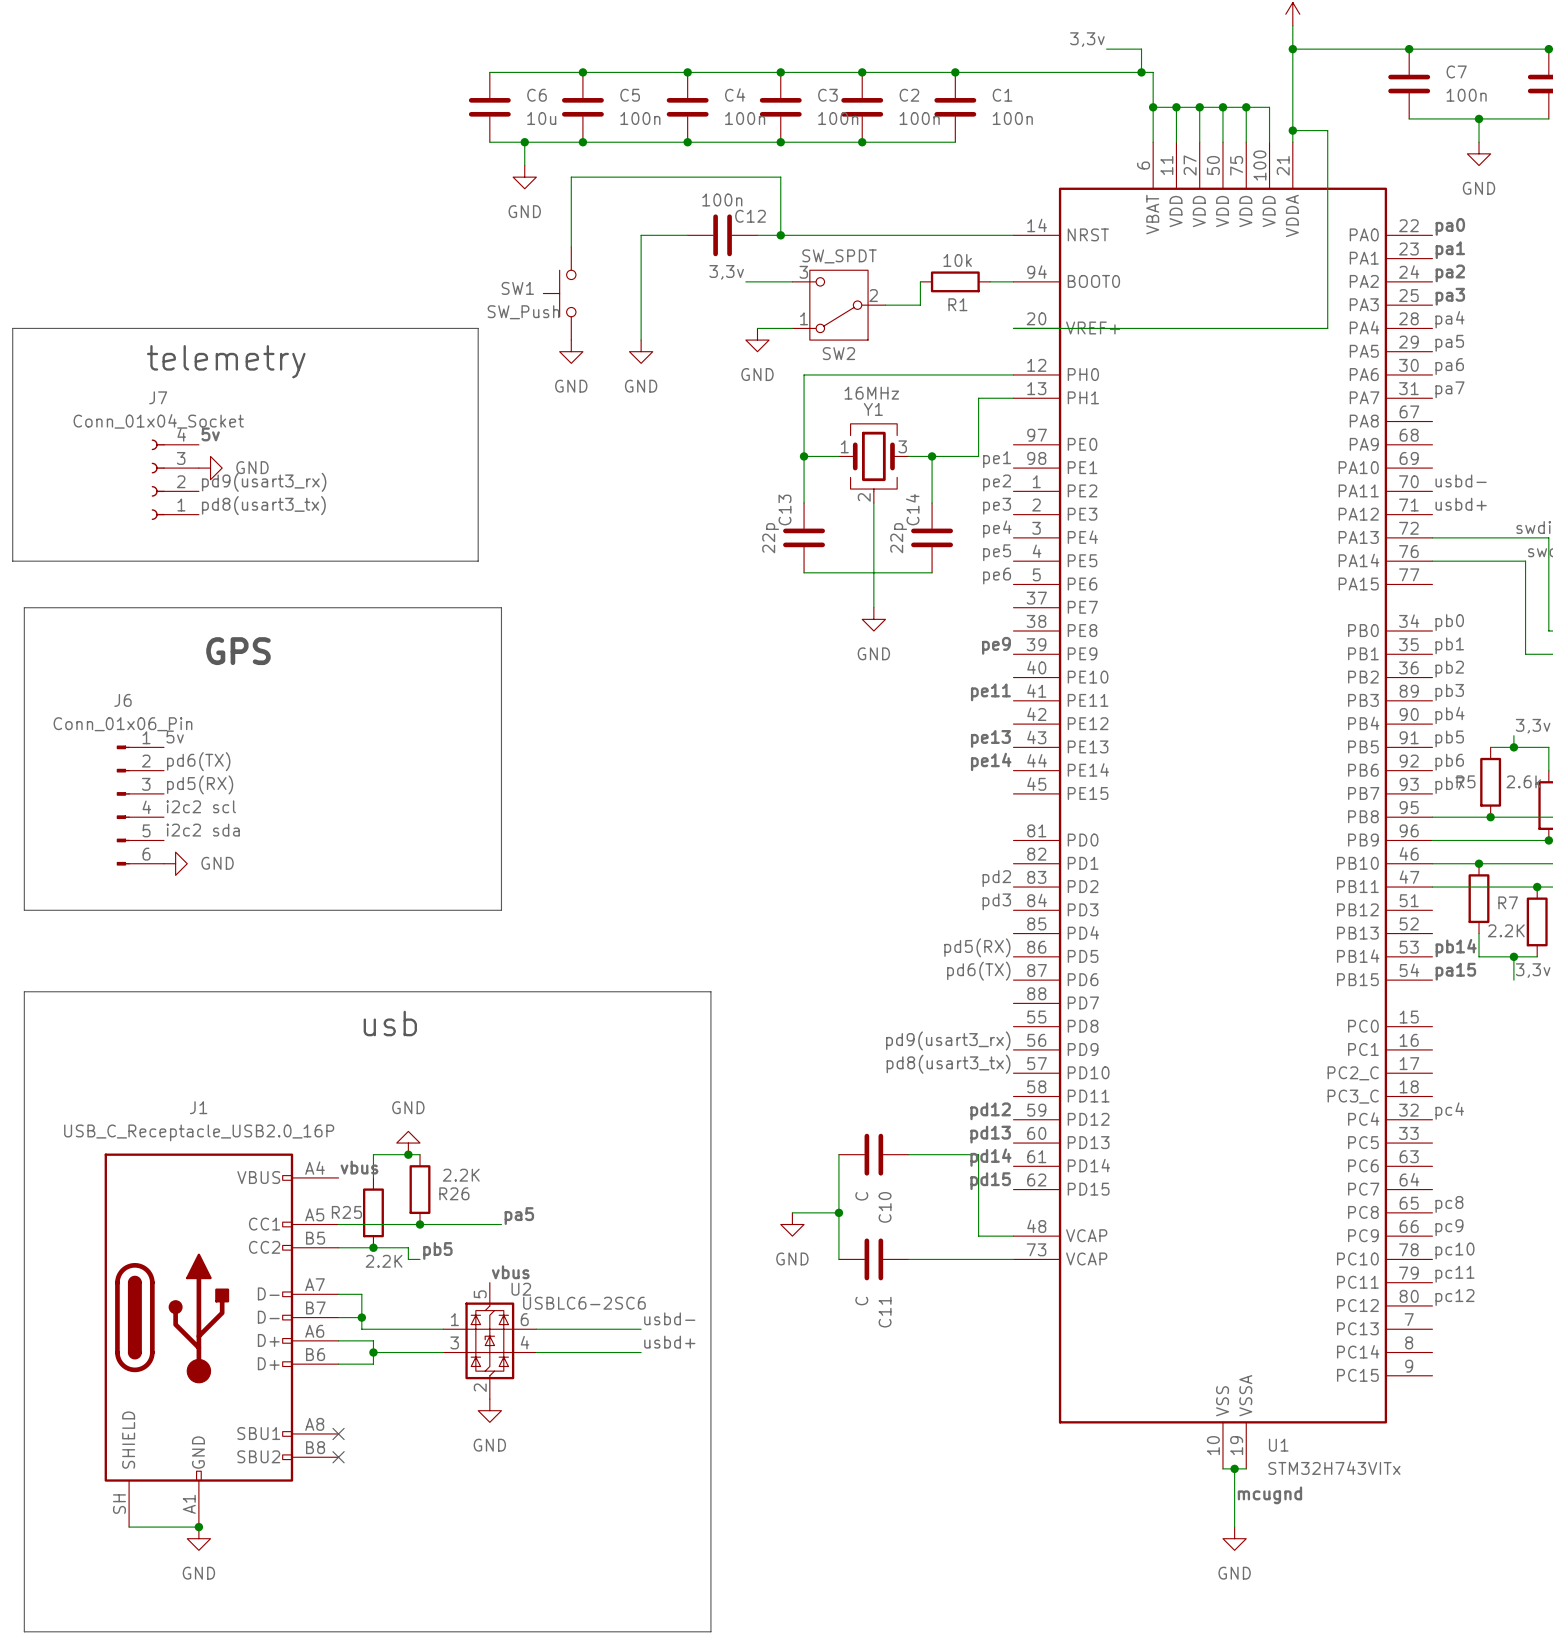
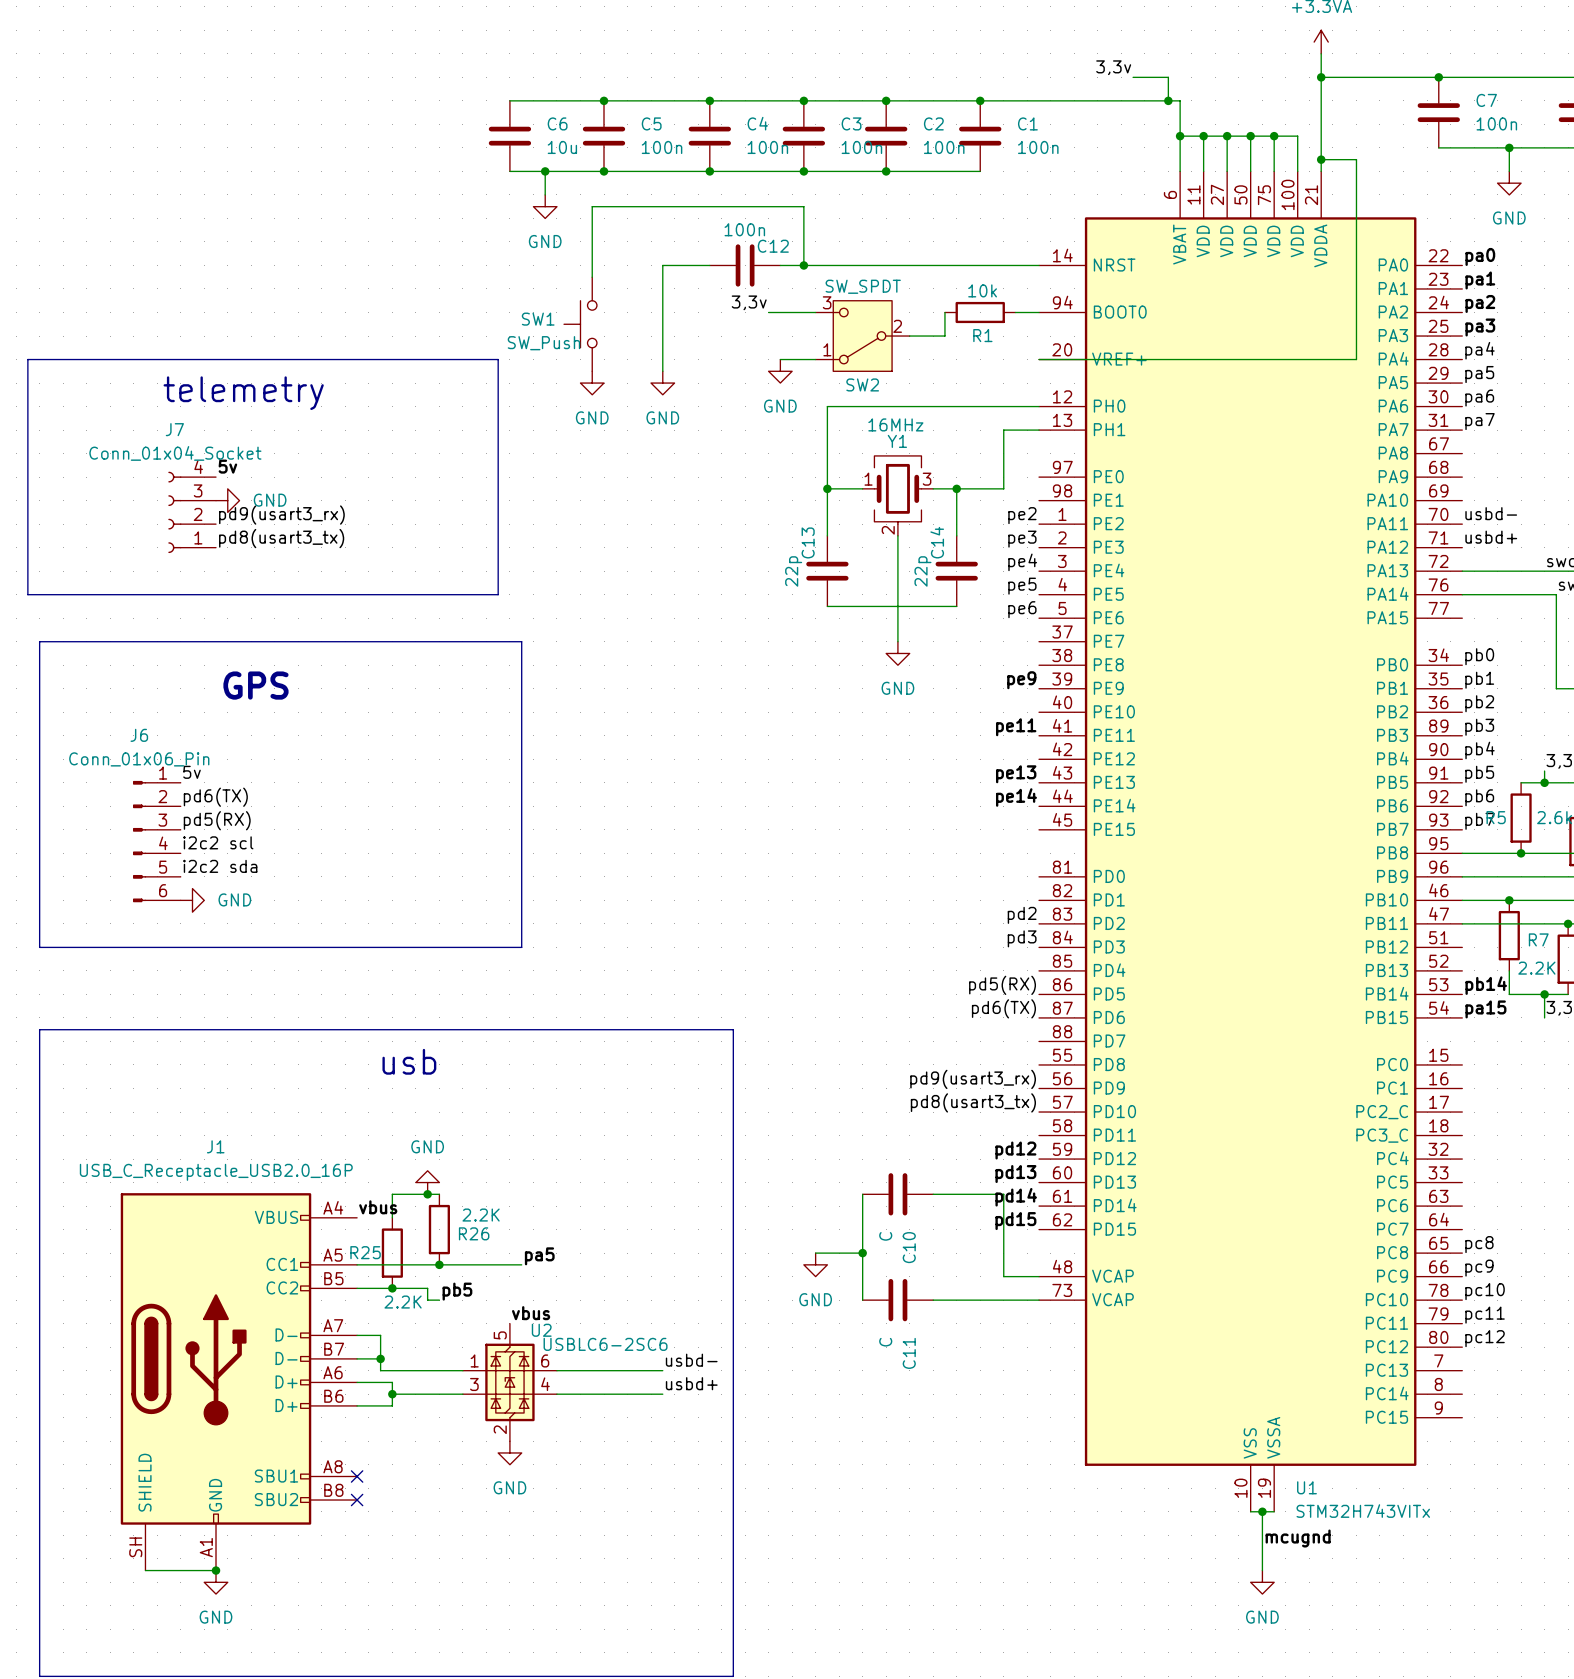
label: pe1 (997, 459) -> none
label: pc4 (1449, 1111) -> none

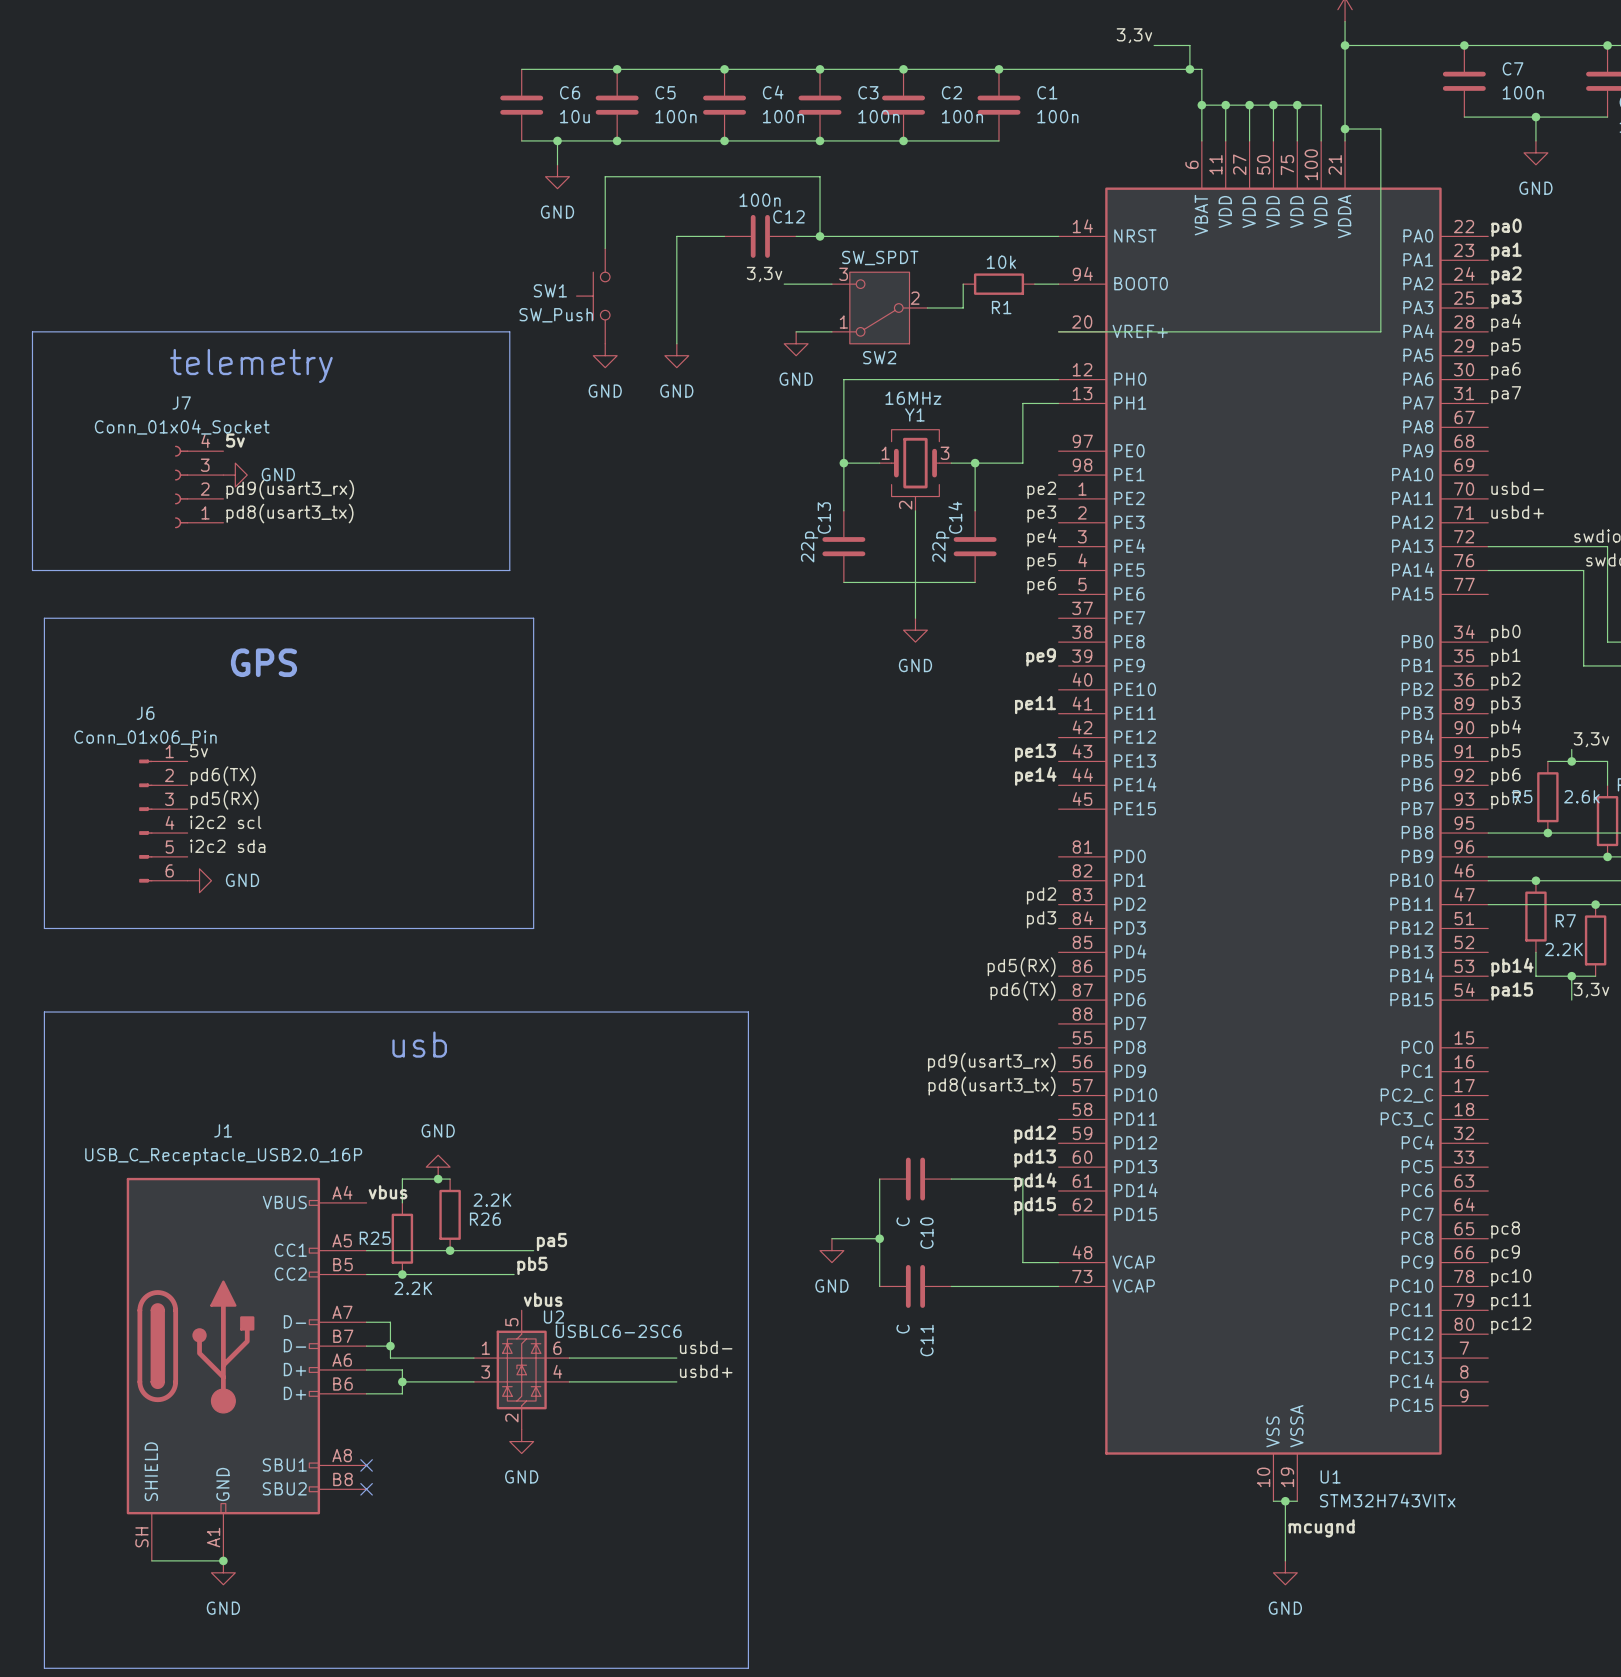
wire: (427, 1288) (427, 1300) (439, 1300) -> (438, 1274) (514, 1274)
label position: pb5 (457, 1291) -> pb5 (532, 1265)

